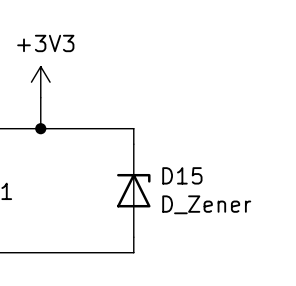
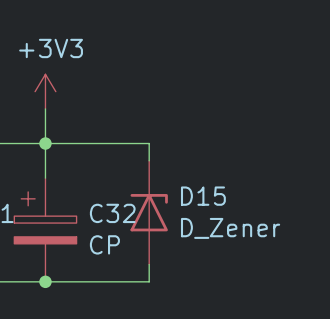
wire: none -> (45, 143) (45, 178)
C32: none -> CP (45, 229)
junction: none -> (45, 281)

